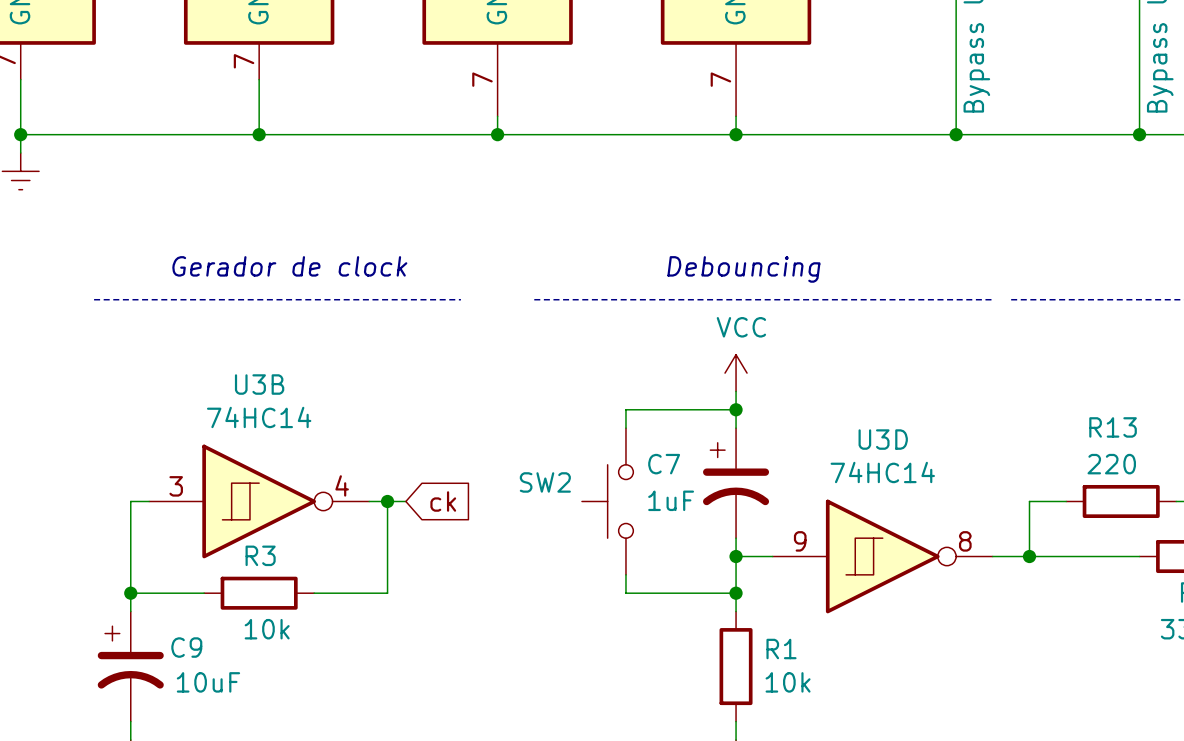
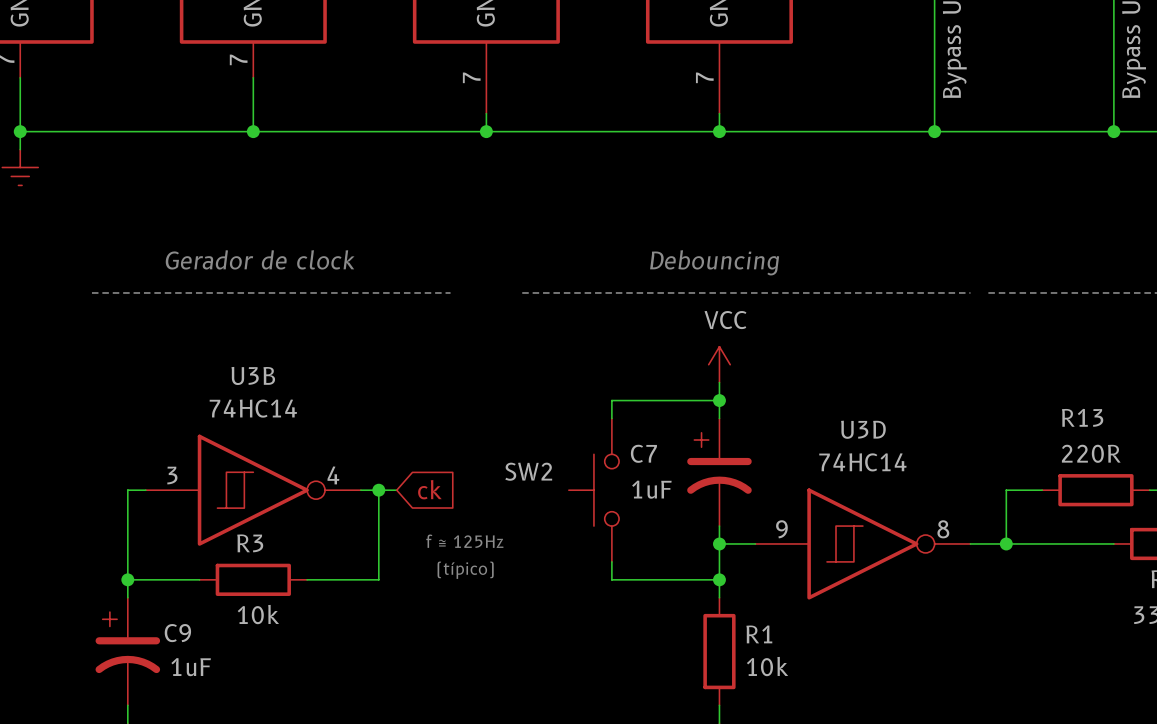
R13 value: 220 (1111, 464) -> 220R (1091, 453)
text: none -> f ≅ 125Hz (464, 541)
text: none -> (típico) (465, 570)
C9 value: 10uF (208, 682) -> 1uF (191, 667)

